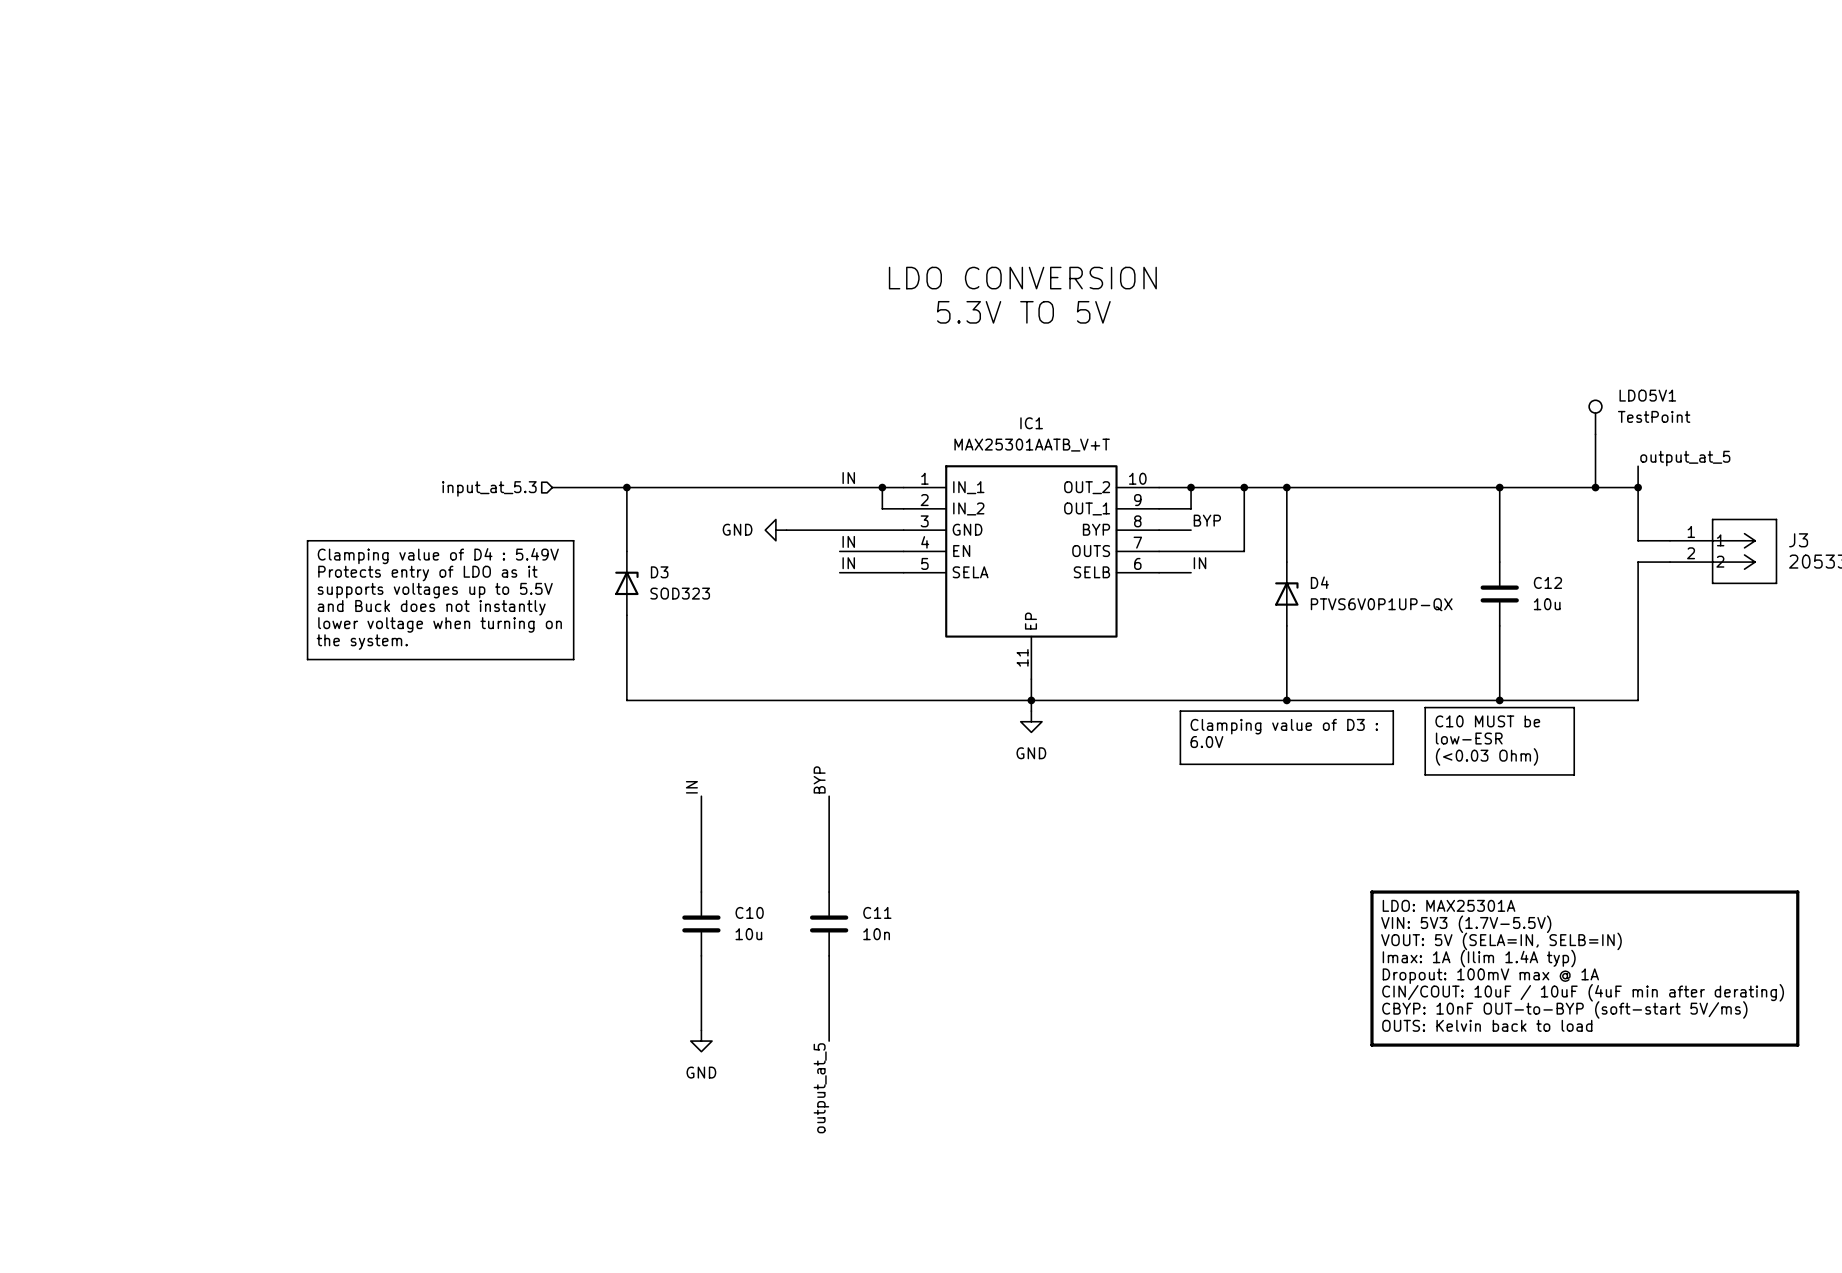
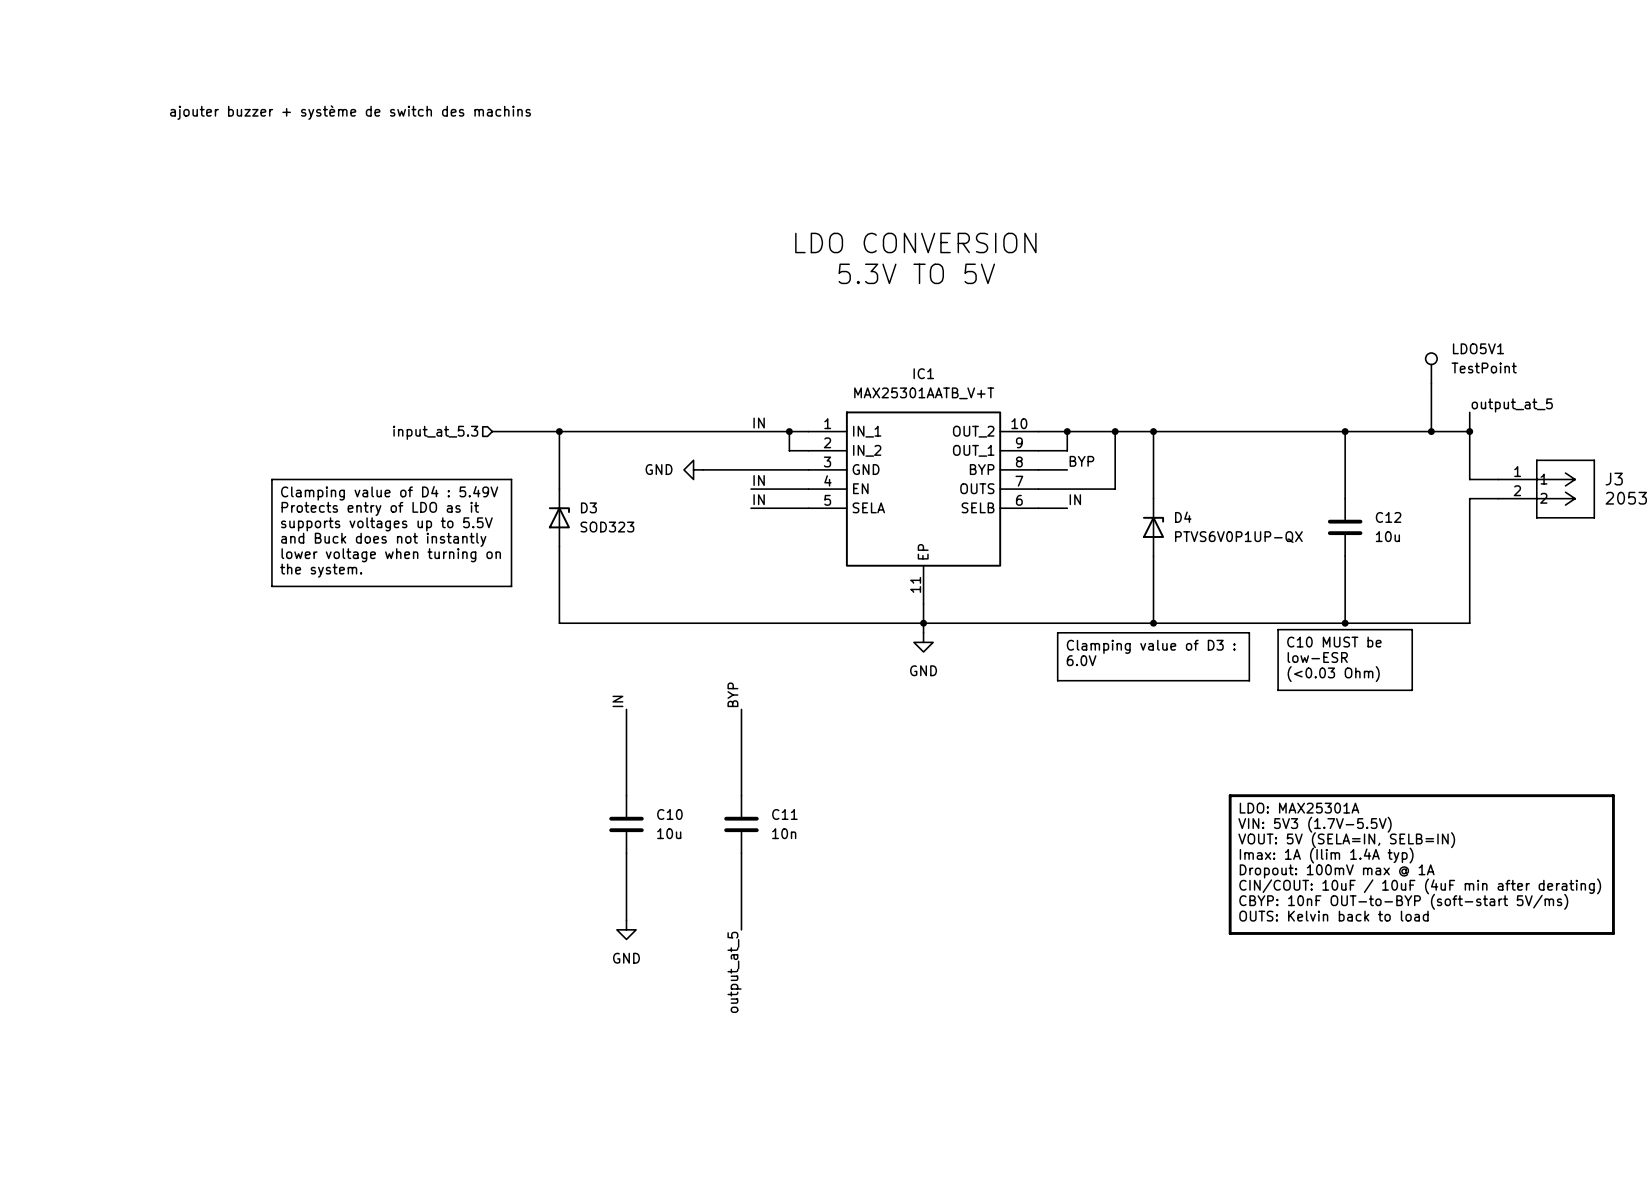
text: none -> ajouter buzzer + système de switch des machins (350, 112)

